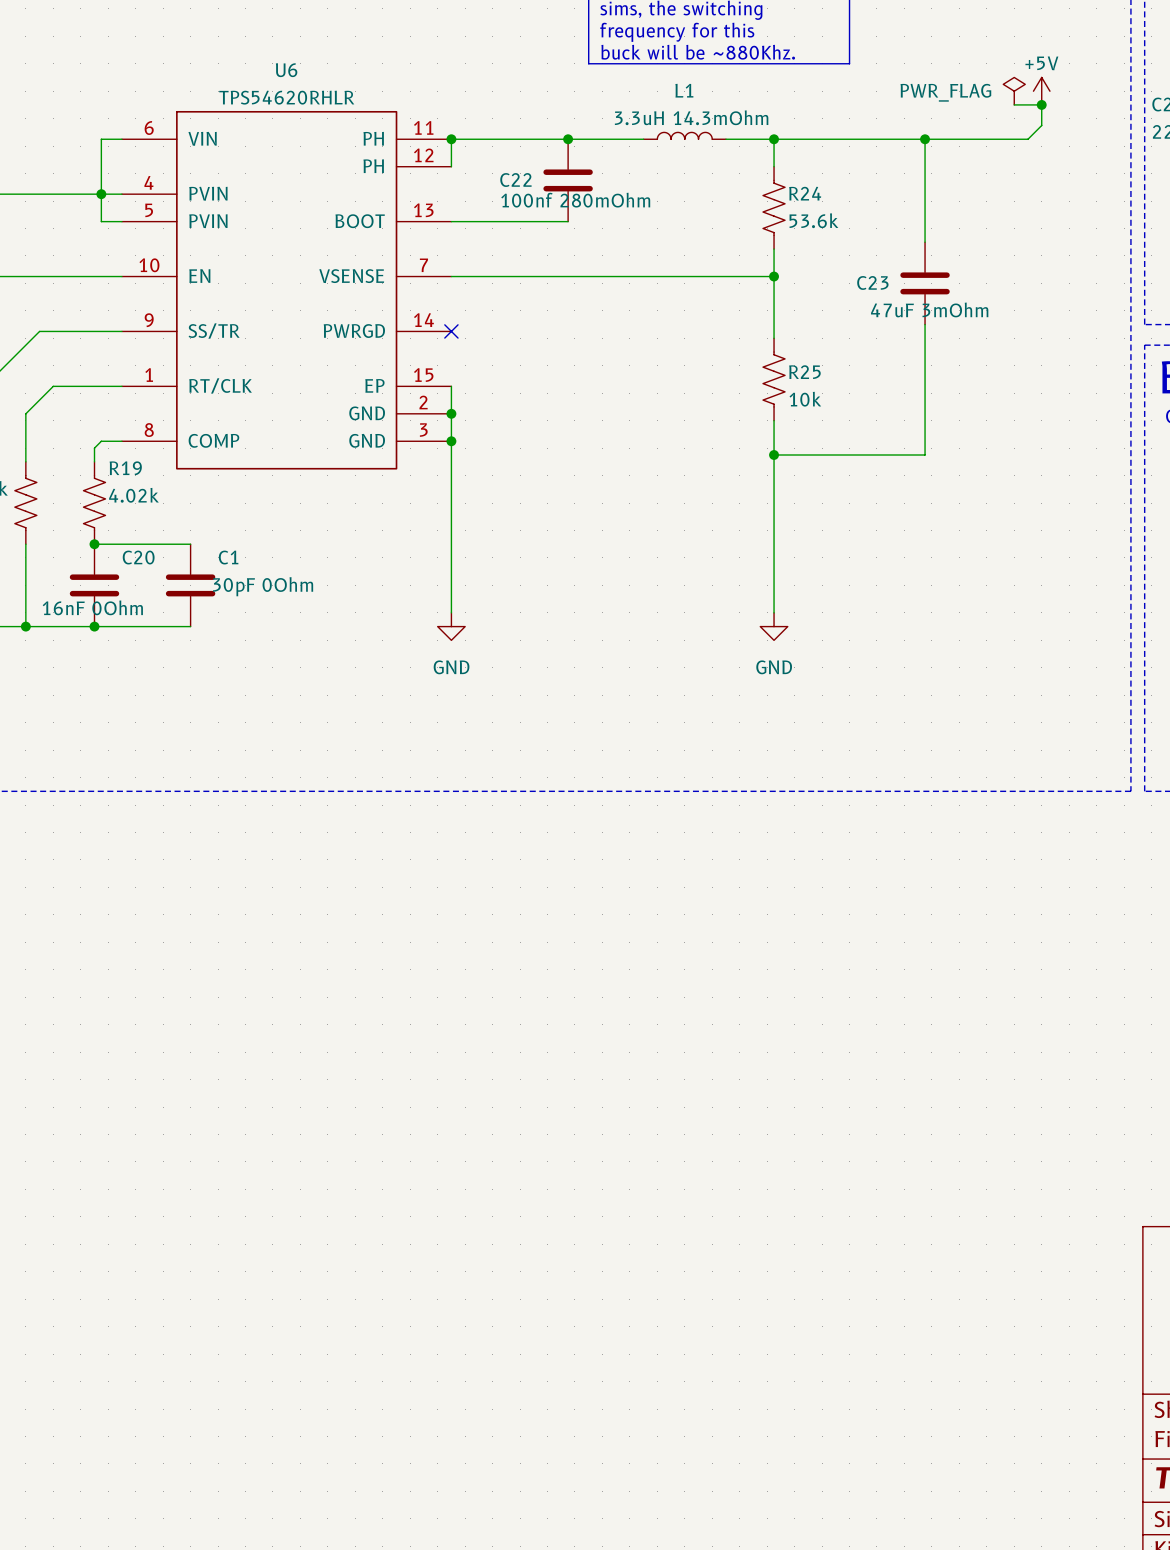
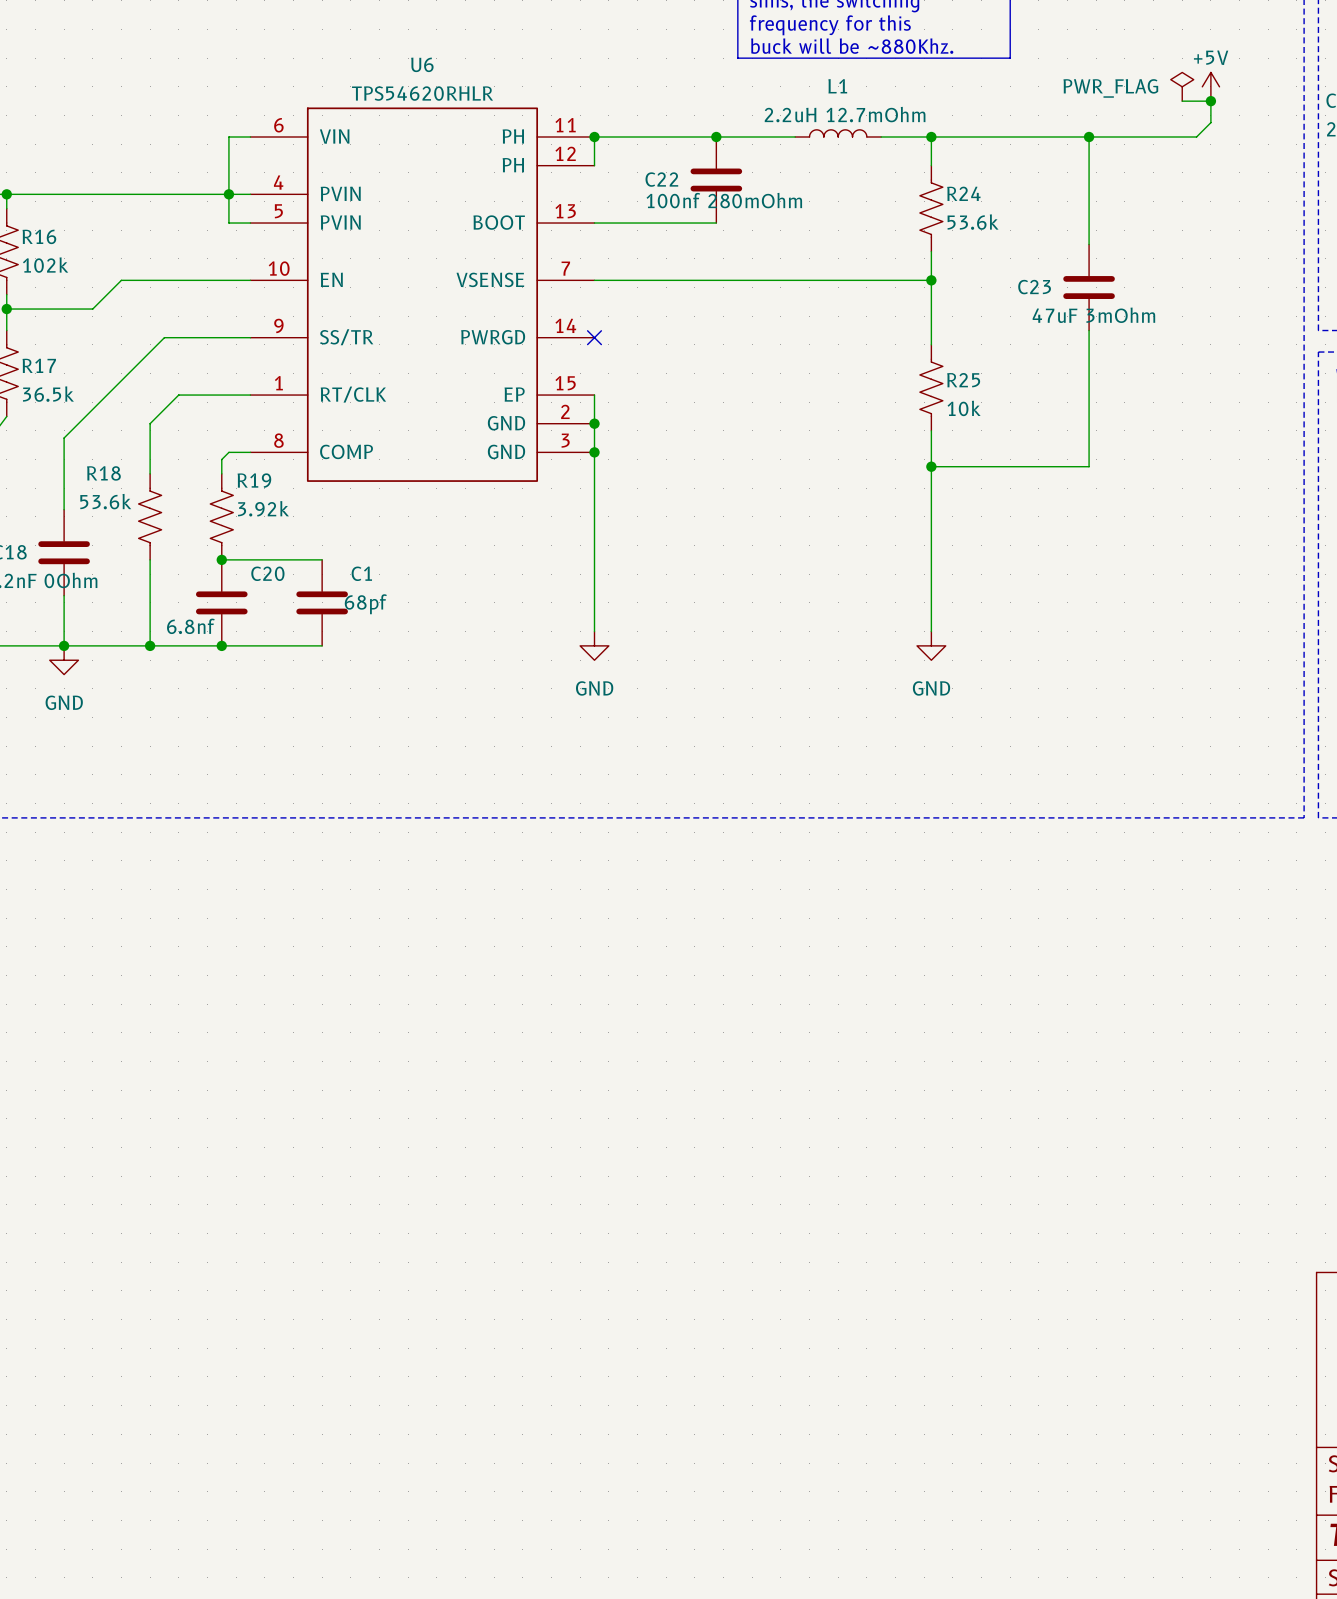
L1 value: 3.3uH 14.3mOhm (691, 117) -> 2.2uH 12.7mOhm (845, 114)
R19 value: 4.02k (133, 495) -> 3.92k (263, 508)
C1 value: 30pF 0Ohm (263, 586) -> 68pf (365, 604)
C20 value: 16nF 0Ohm (92, 607) -> 6.8nf (190, 626)

